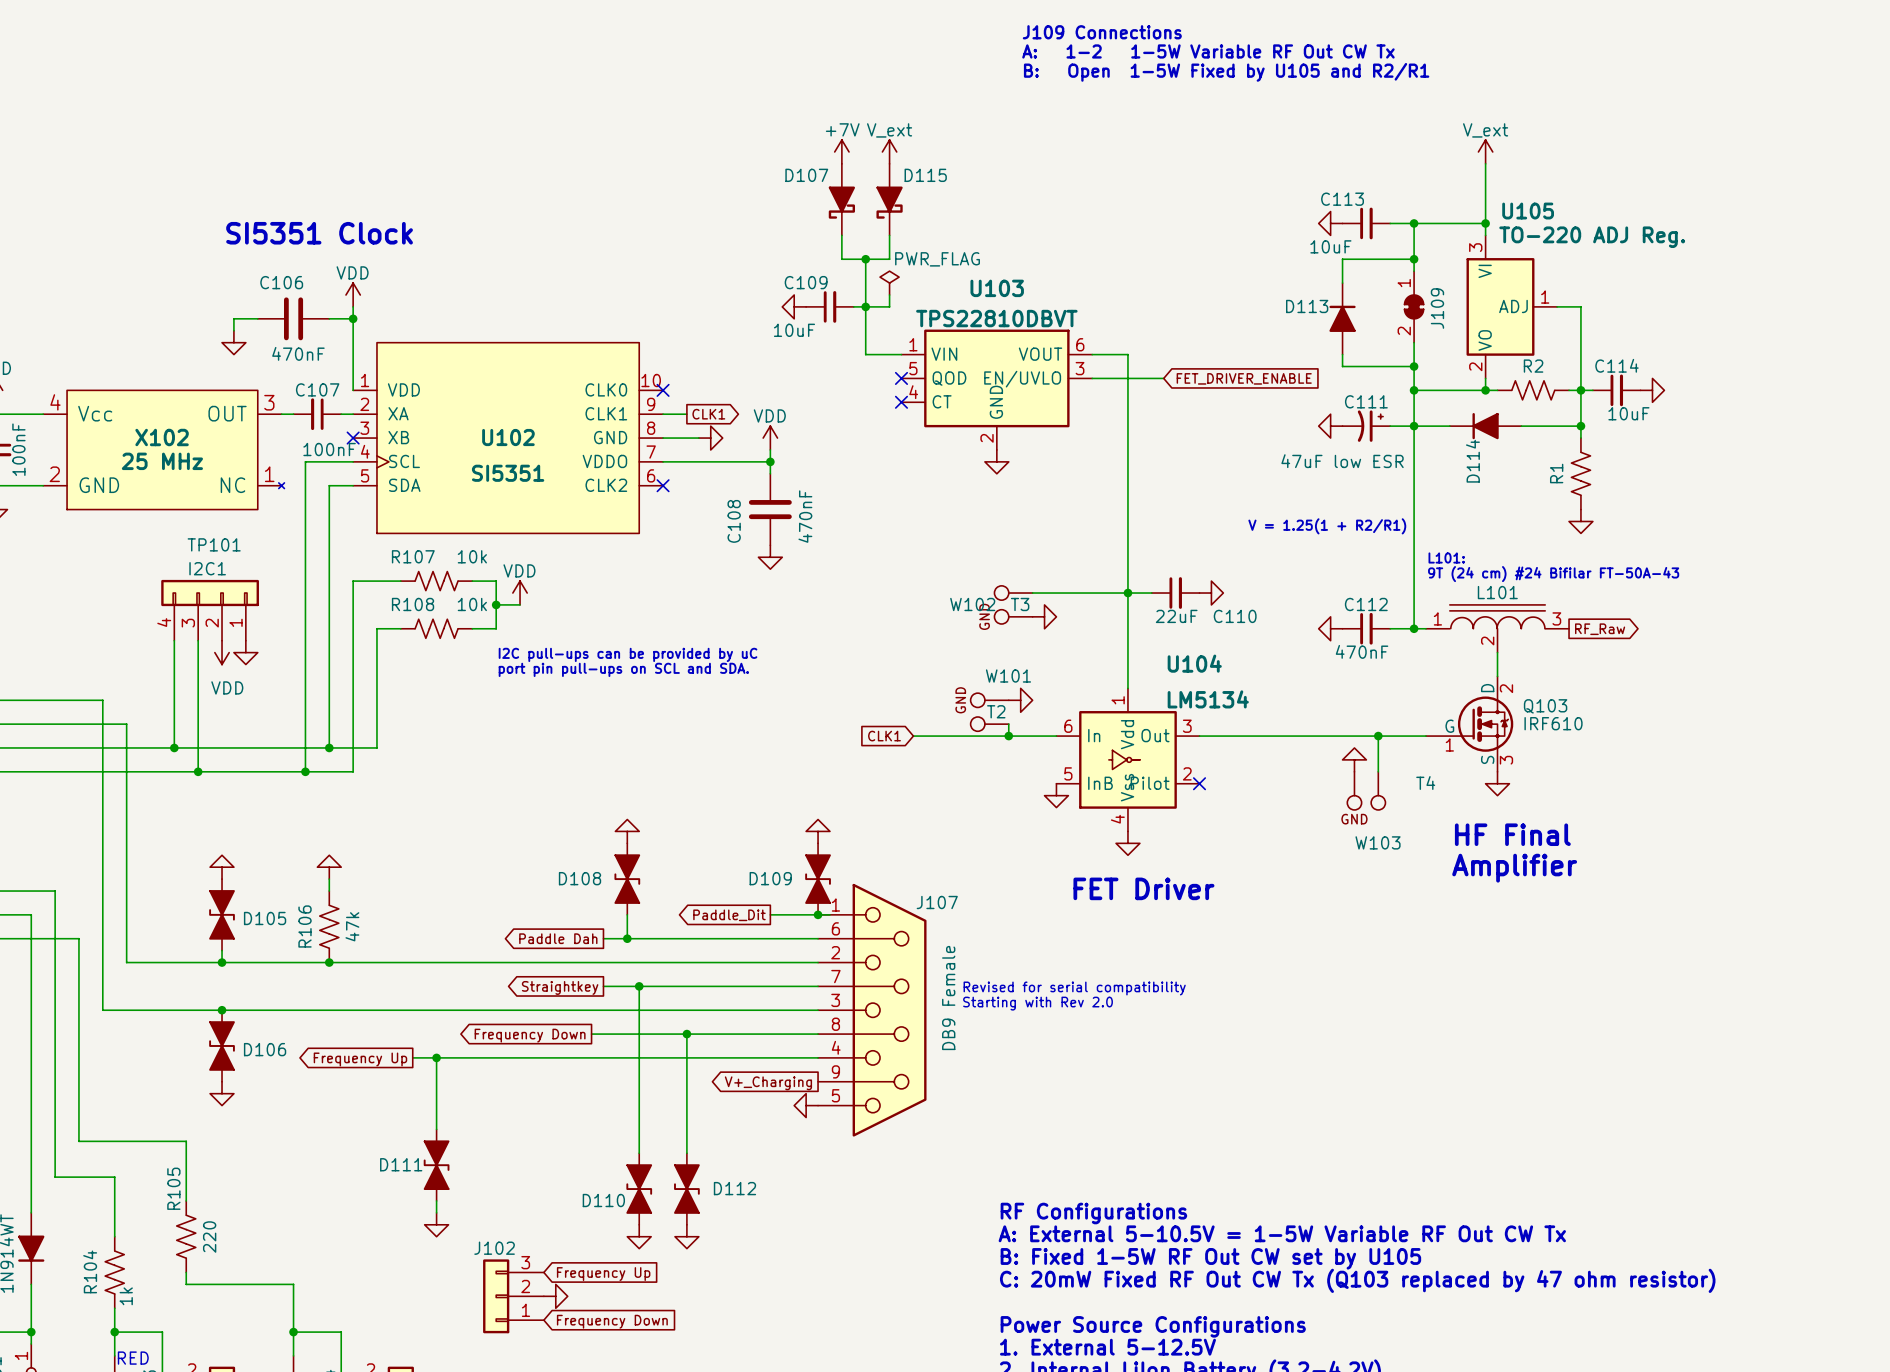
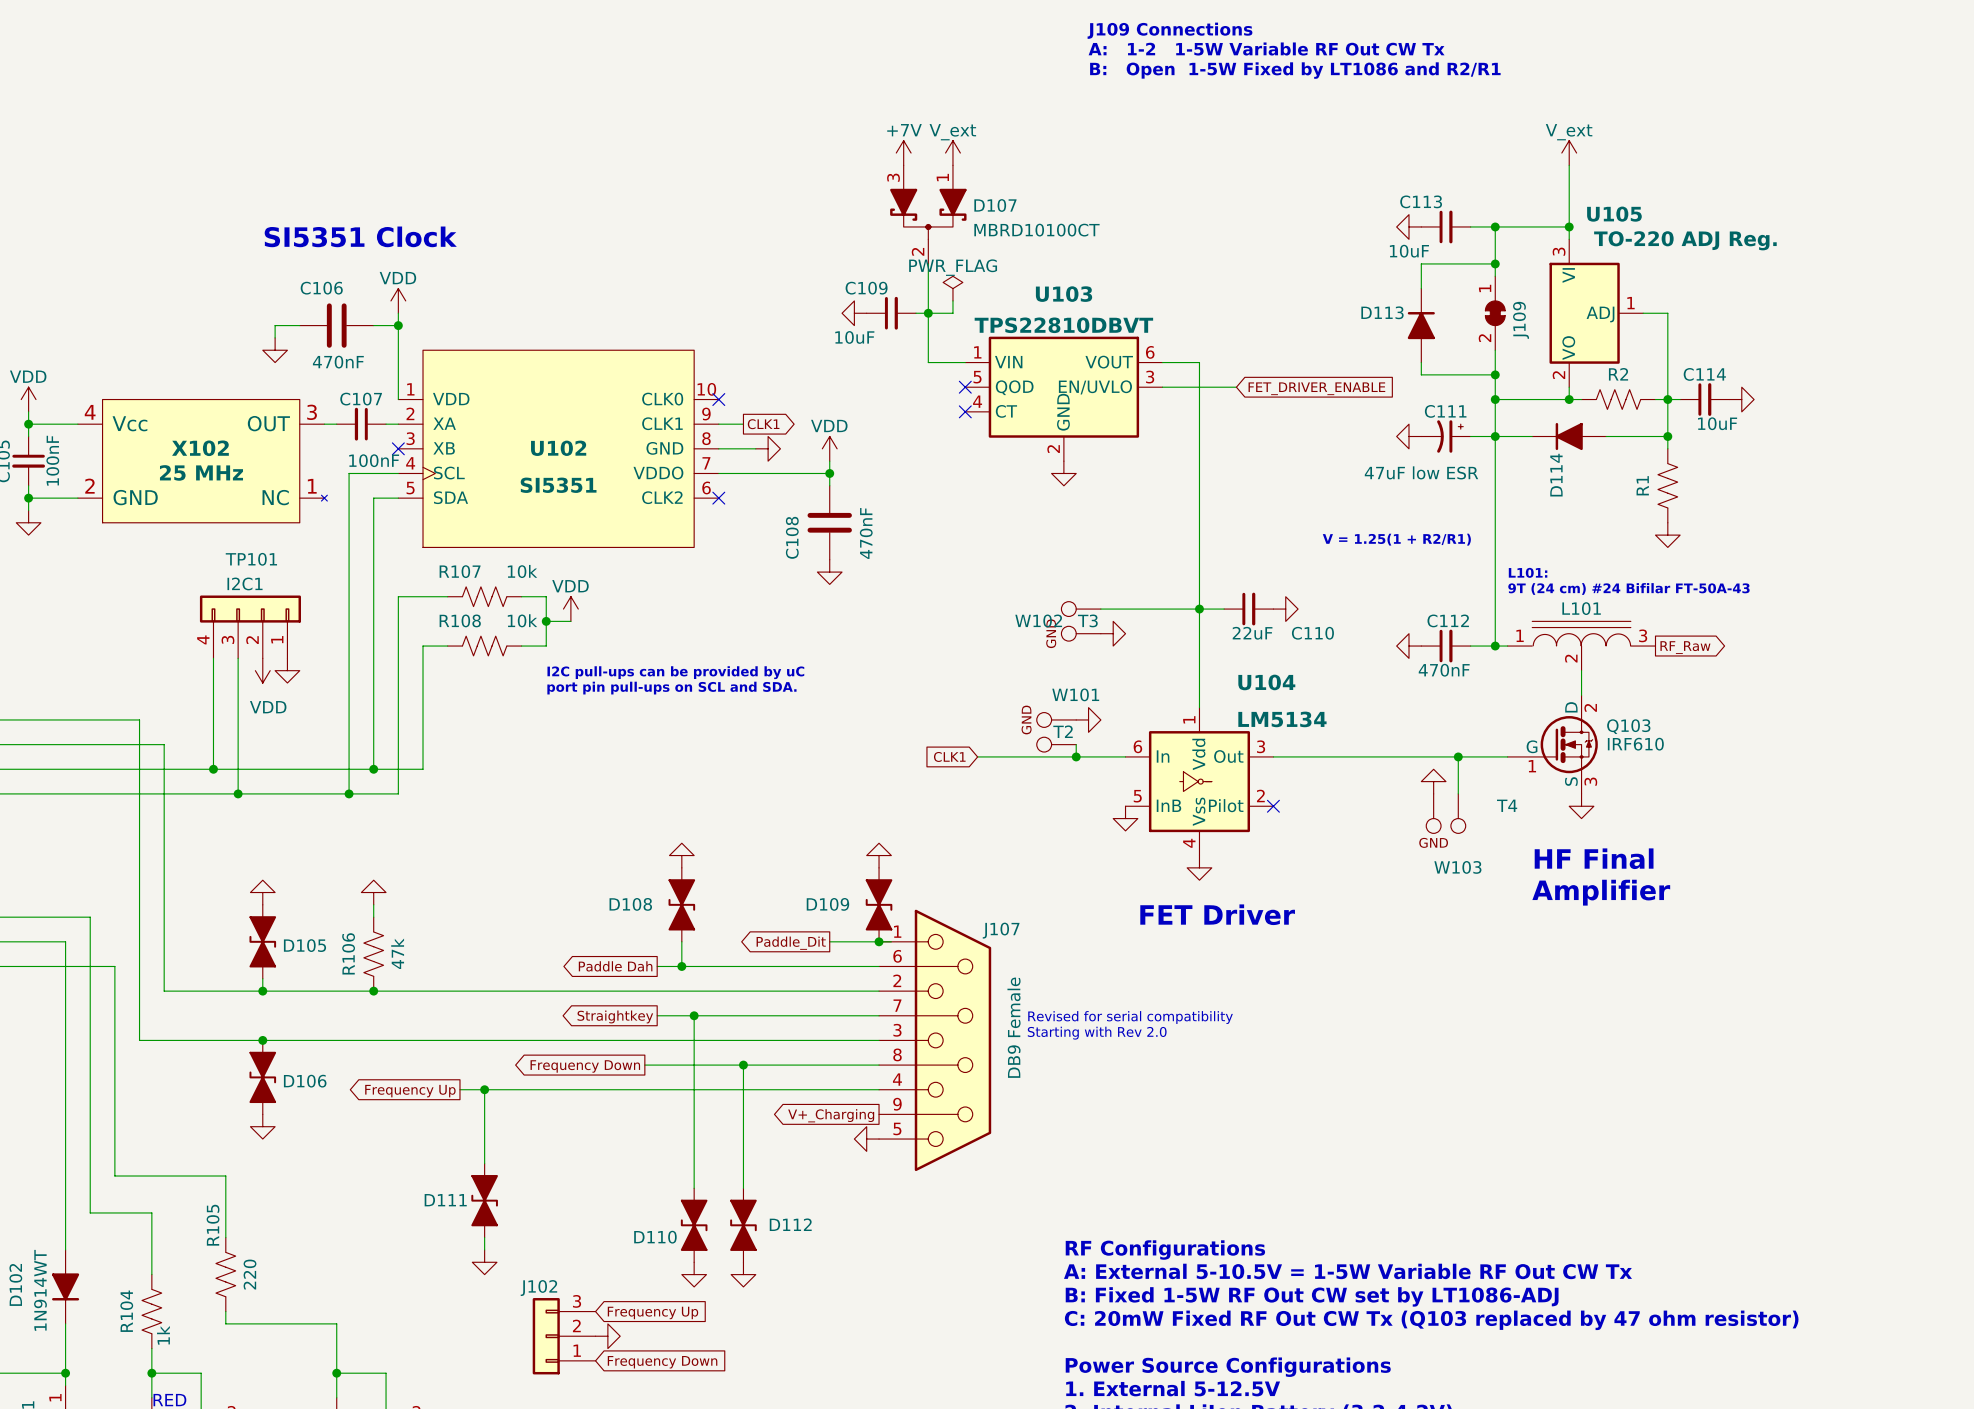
text: B: Open 1-5W Fixed by U105 and R2/R1 (1226, 72) -> B: Open 1-5W Fixed by LT1086 and R2/R1 (1295, 70)
D107 symbol: [828, 163, 855, 236] -> [890, 165, 967, 264]
D107 name position: D107 (806, 175) -> D107 (995, 205)
D115: (889, 199) -> none
D107 value: none -> MBRD10100CT (1036, 230)
wire: (841, 235) (841, 259) (889, 259) (889, 235) -> none
junction: (865, 259) -> none
power symbol text position: PWR_FLAG (937, 259) -> PWR_FLAG (953, 267)
text: B: Fixed 1-5W RF Out CW set by U105 (1210, 1258) -> B: Fixed 1-5W RF Out CW set by LT1086-ADJ (1312, 1296)

